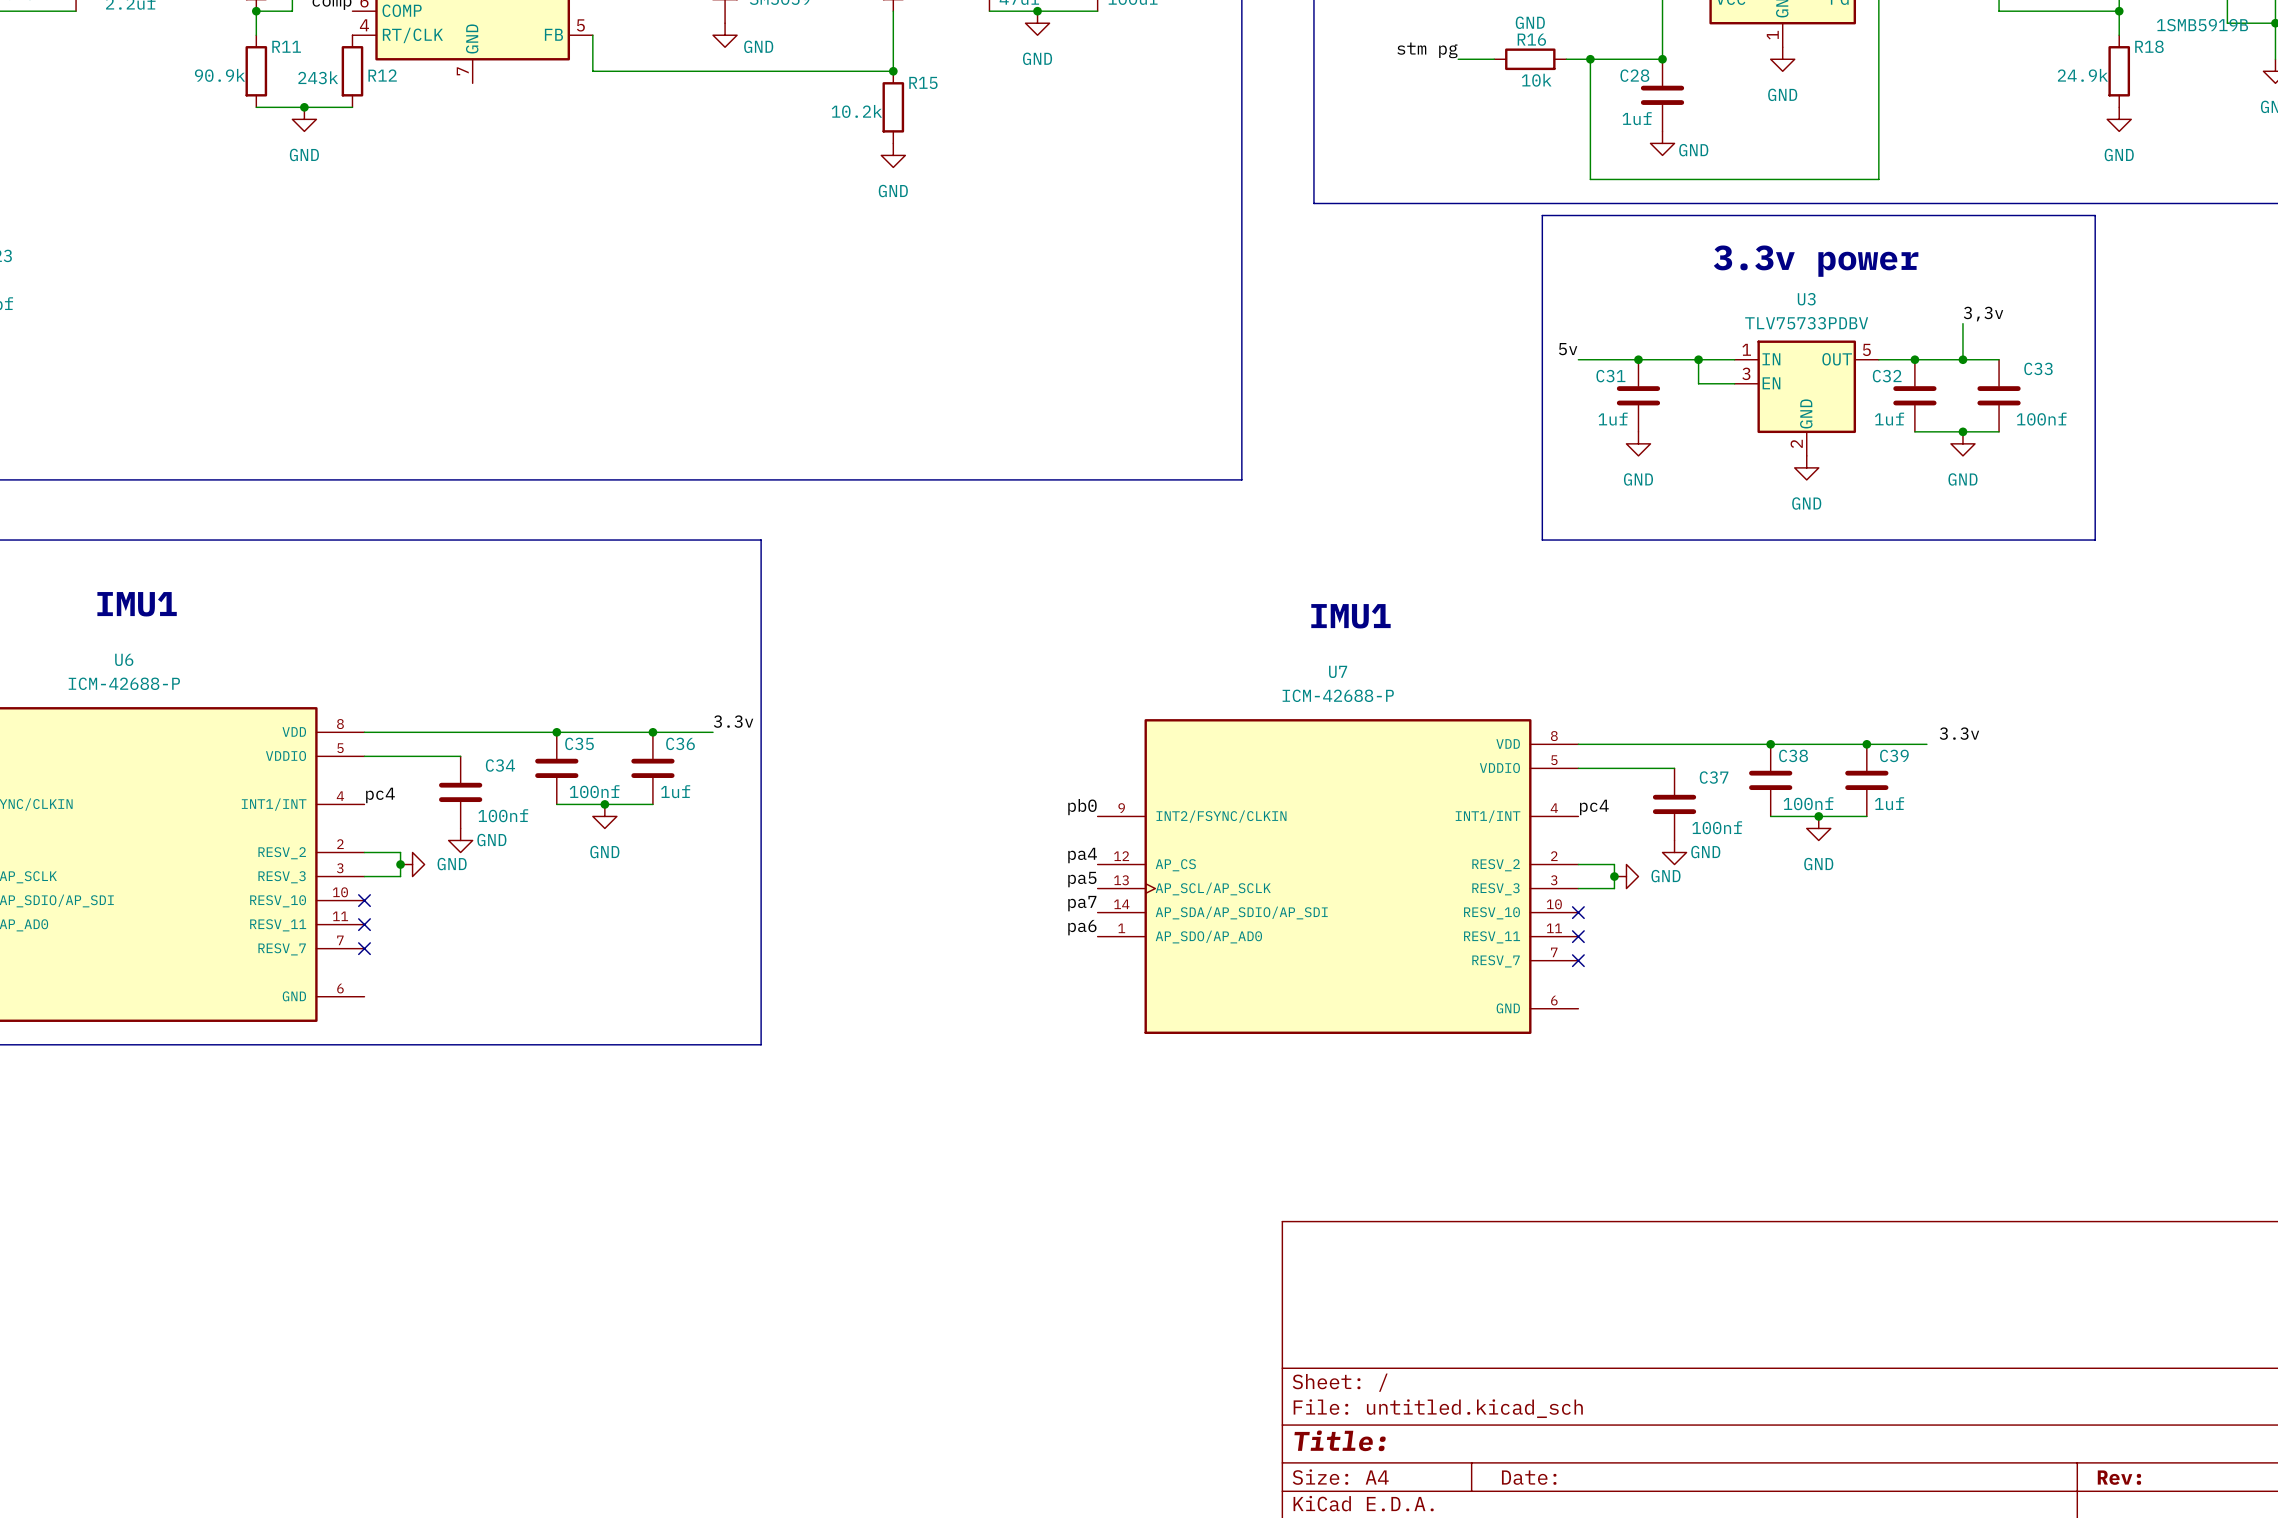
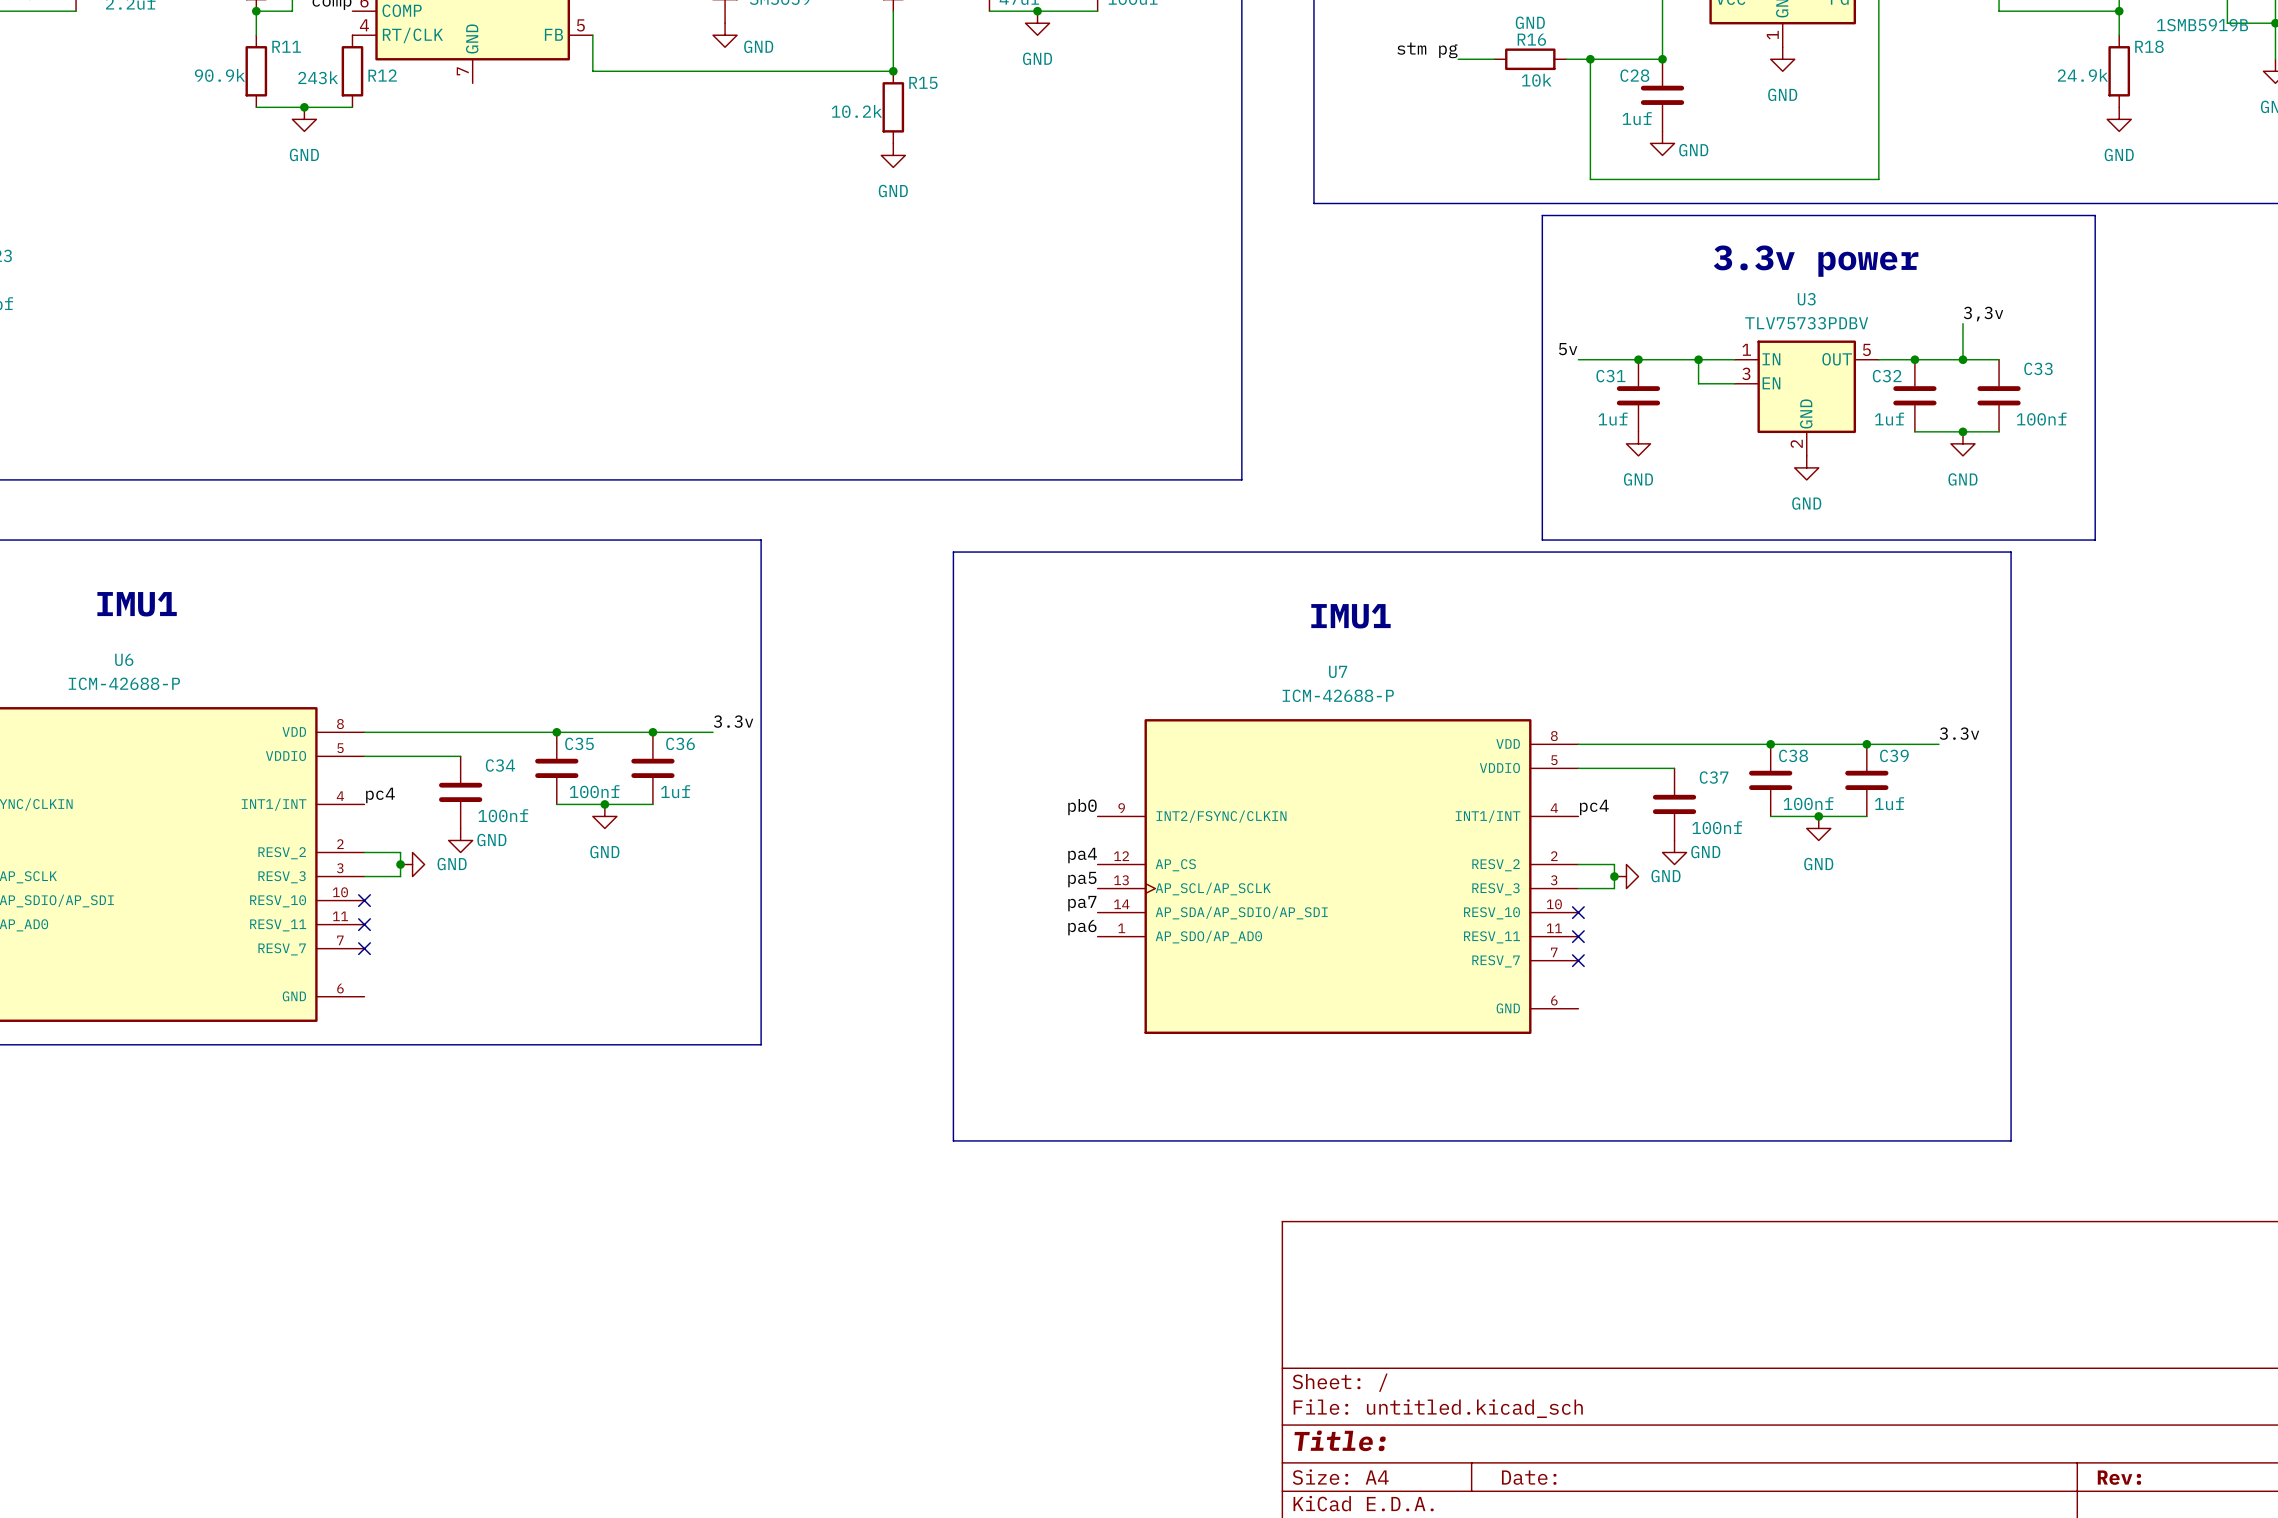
line: none -> (953, 552) (2011, 552) (2011, 1140) (953, 1140) (953, 552)
wire: none -> (1926, 744) (1938, 744)

